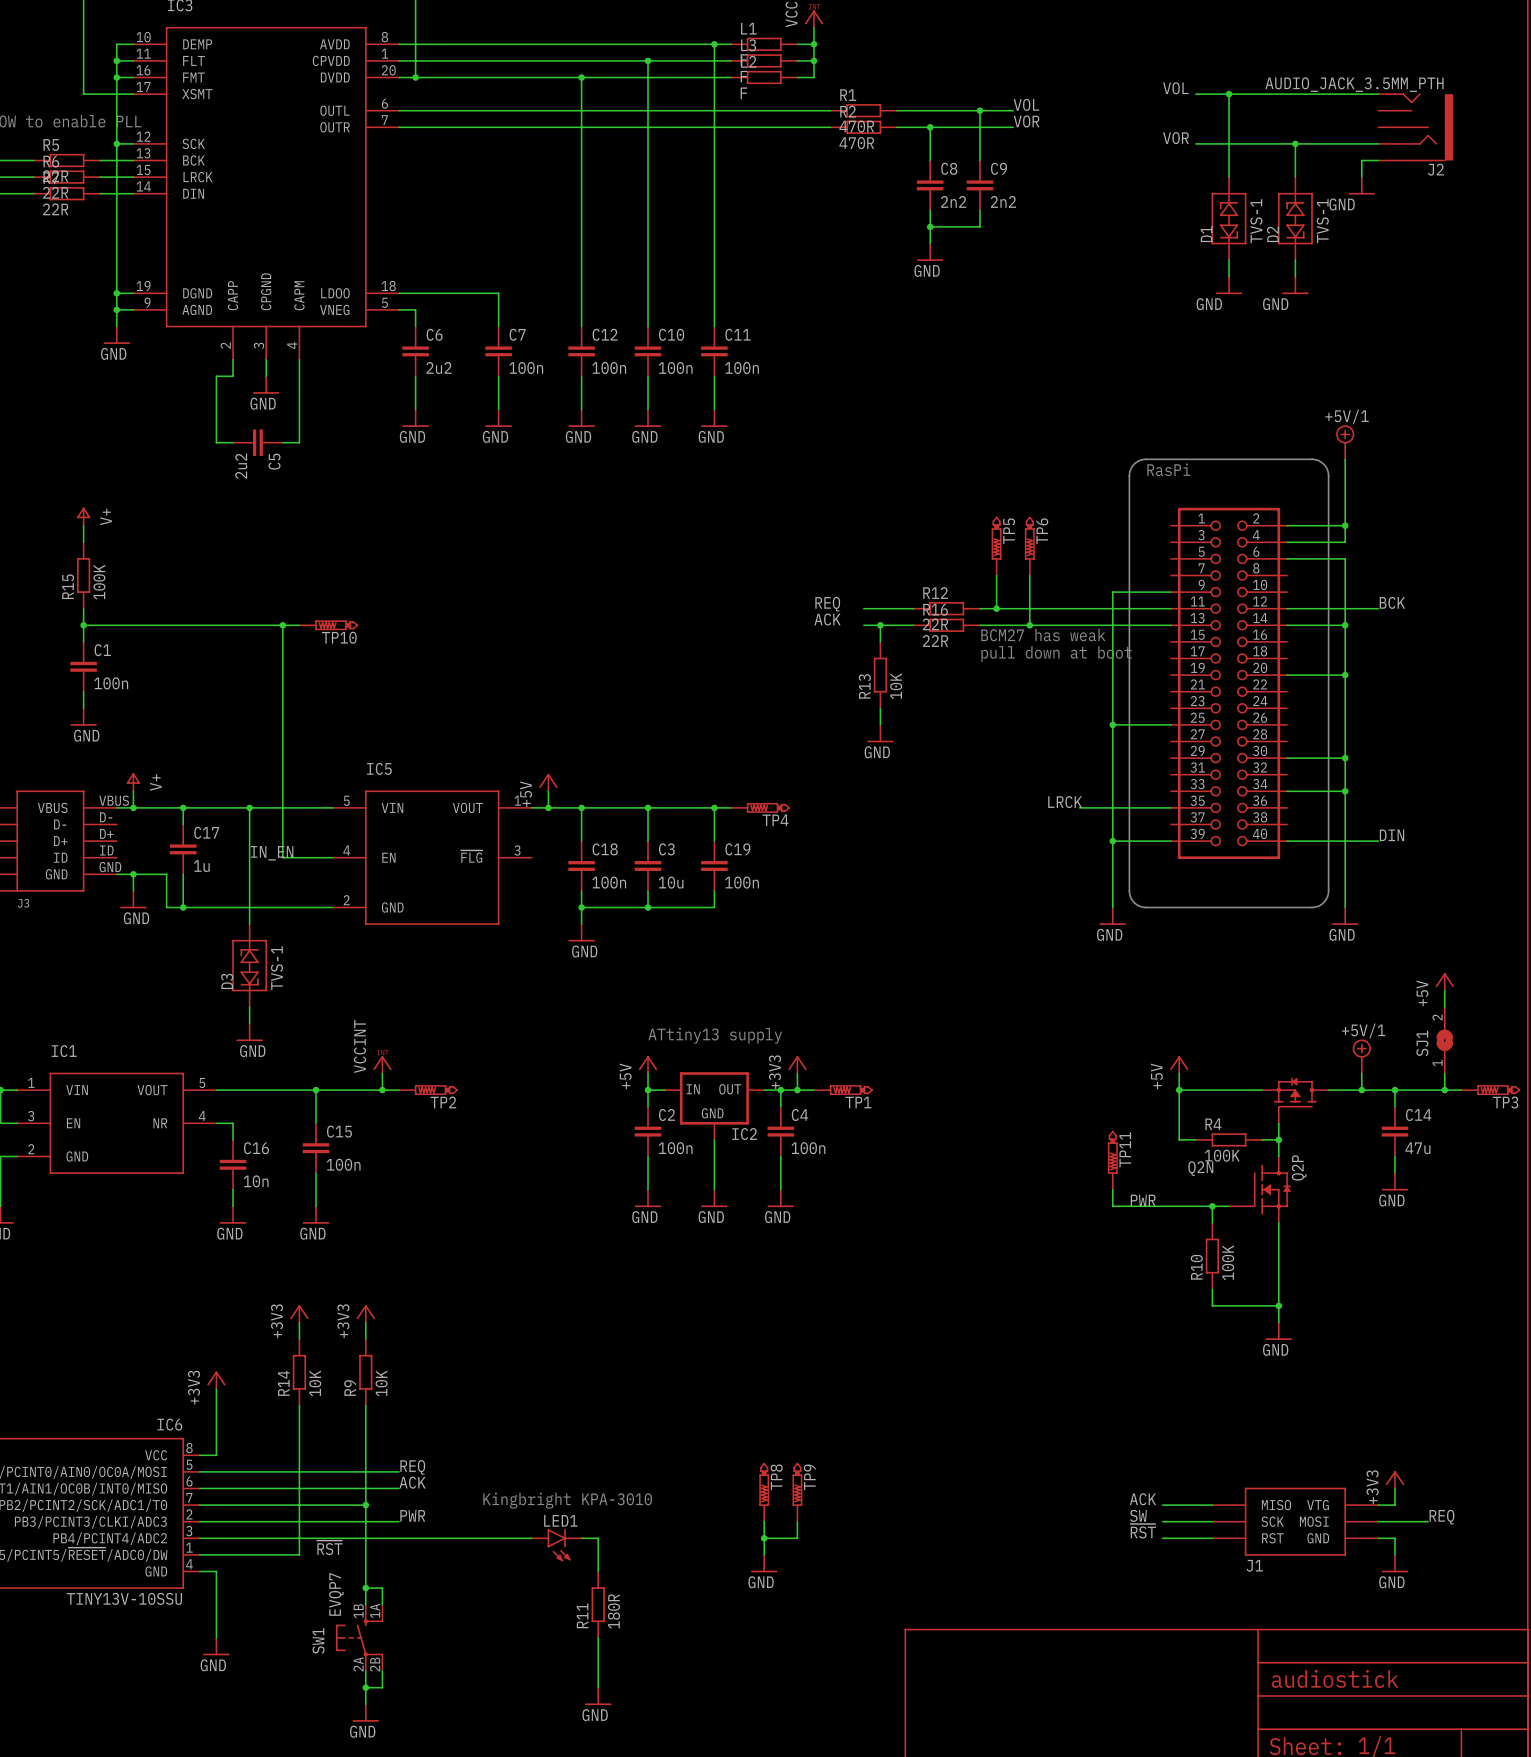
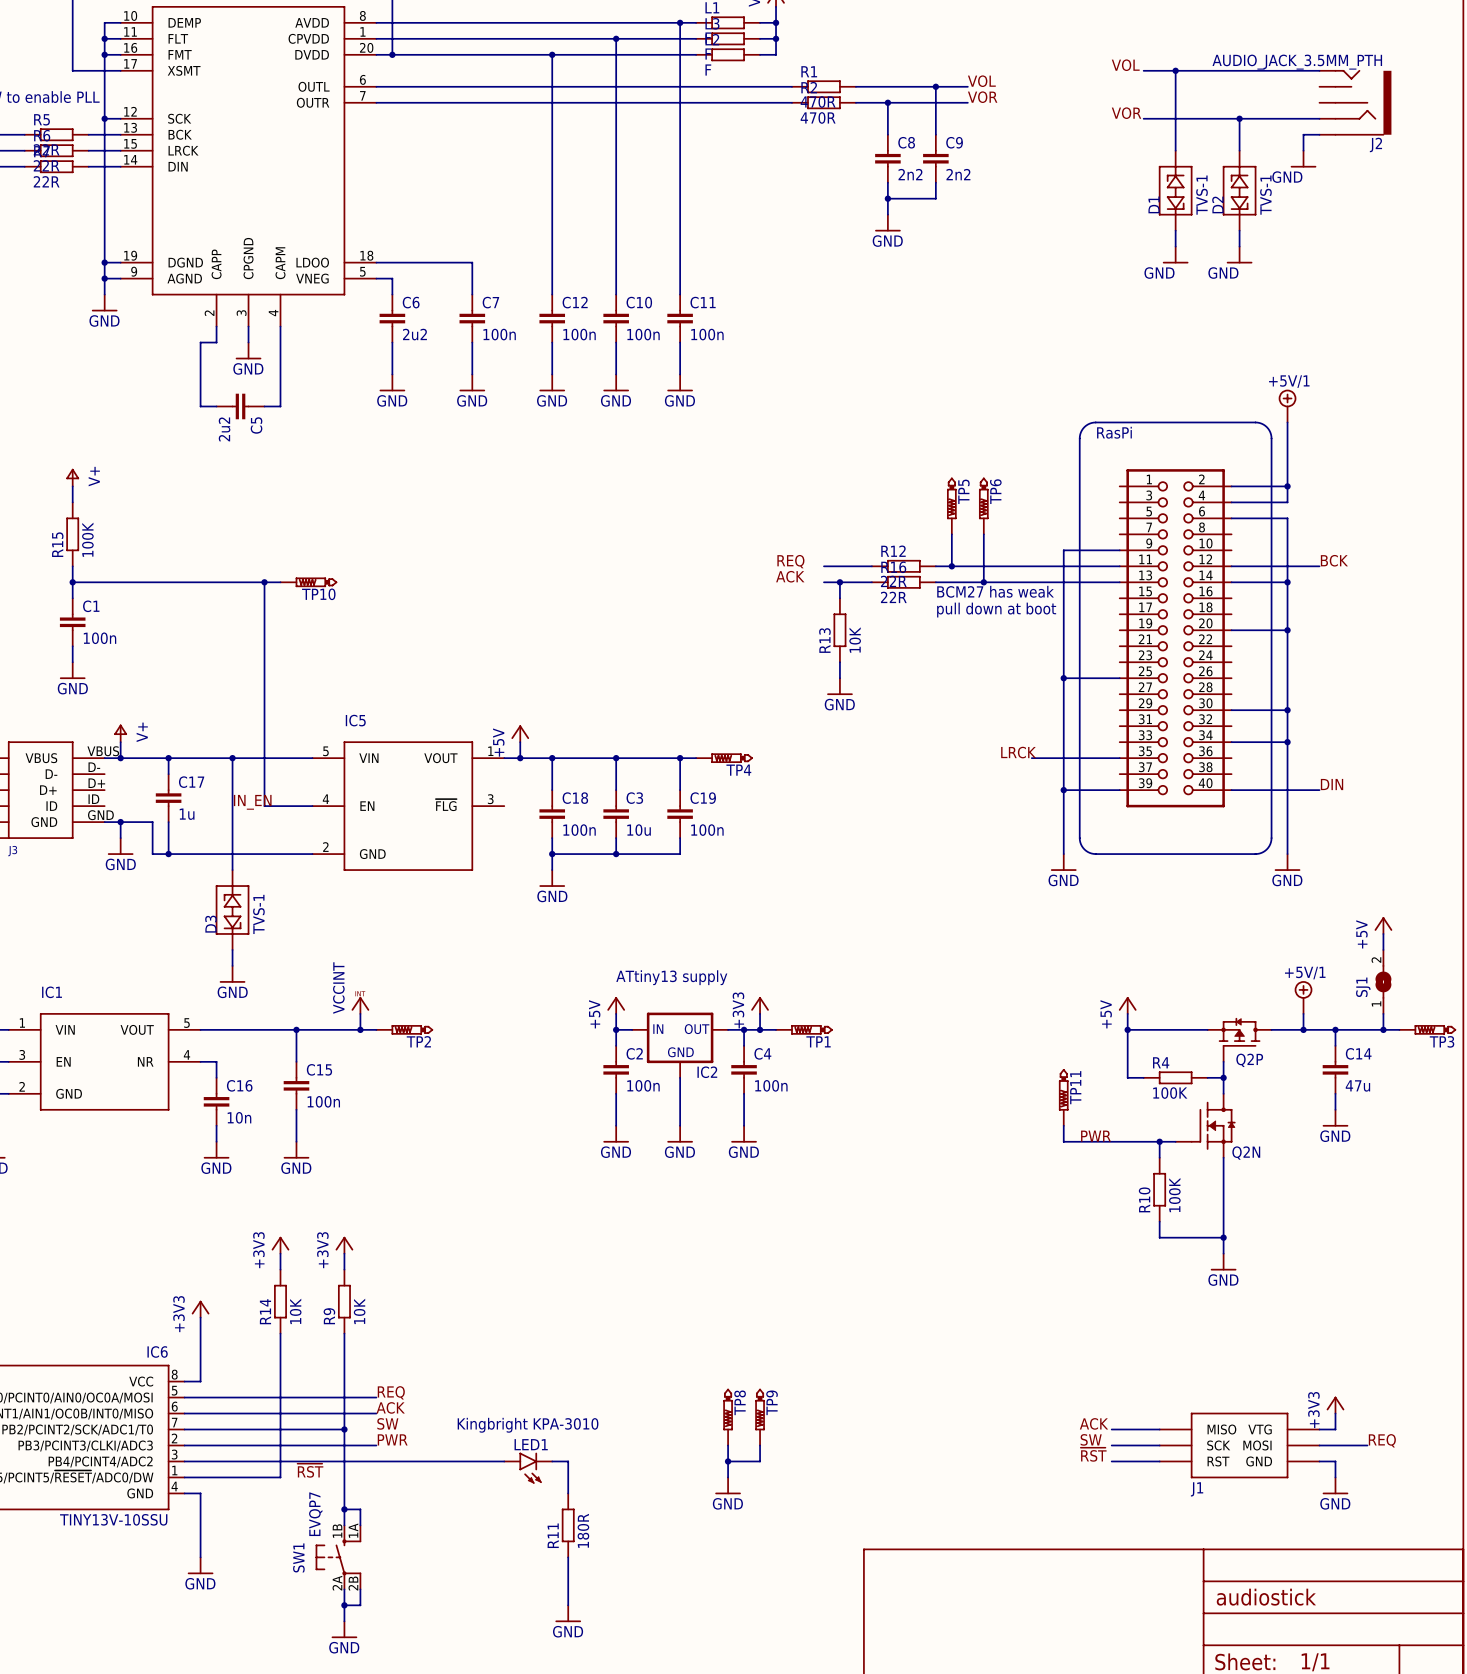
Q2P name rotation: 0° (1299, 1167) -> 90° clockwise (1249, 1060)
Q2P name position: Q2P (1299, 1167) -> Q2P (1249, 1060)
Q2N name position: Q2N (1200, 1168) -> Q2N (1246, 1153)
label: none -> SW (387, 1423)

